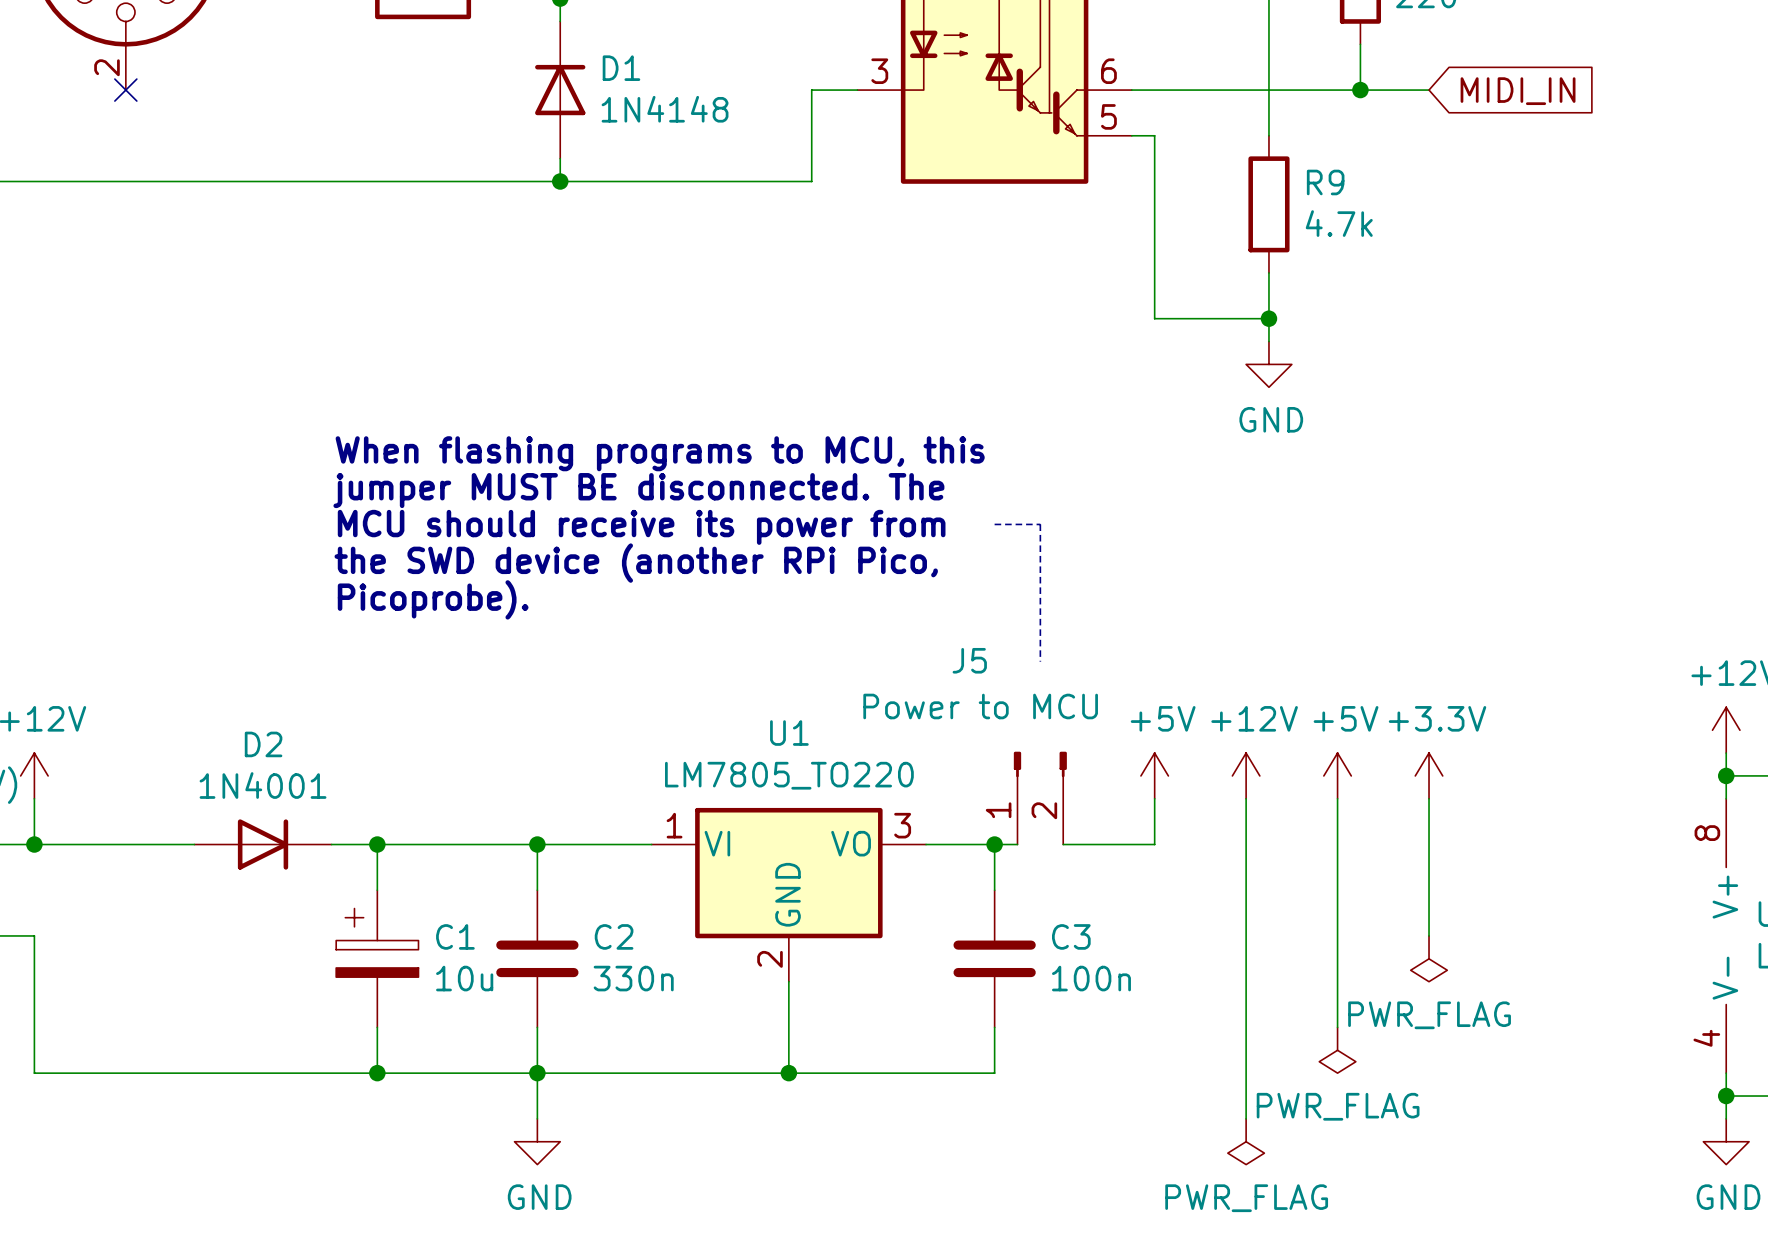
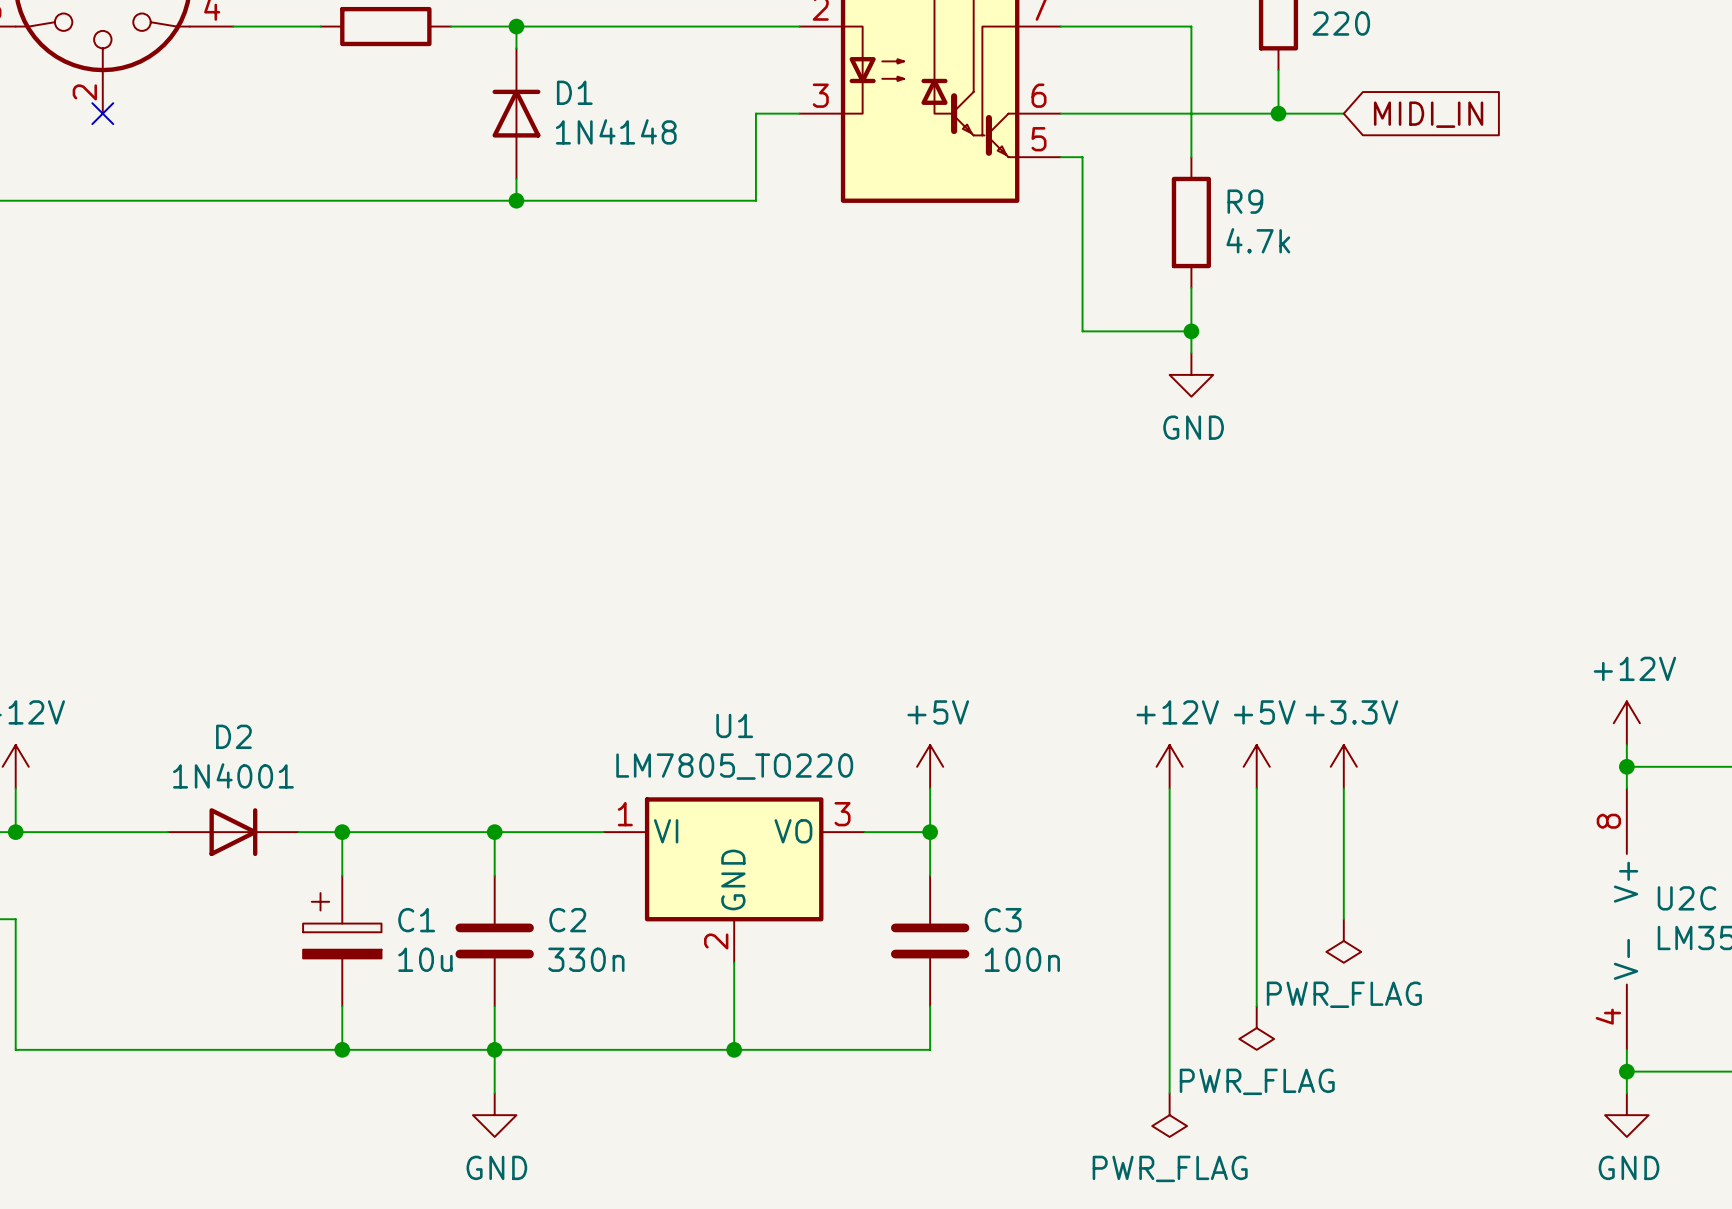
text: When flashing programs to MCU, this (660, 453) -> none
text: jumper MUST BE disconnected. The (638, 490) -> none
line: (994, 524) (1040, 524) (1040, 661) -> none
text: MCU should receive its power from (641, 527) -> none
text: the SWD device (another RPi Pico, (636, 563) -> none
text: Picoprobe). (433, 599) -> none
power symbol position: +5V (1154, 775) -> +5V (930, 766)
J5: Power to MCU (1040, 798) -> none
wire: (1154, 798) (1154, 844) (1063, 844) -> none
wire: (994, 844) (1017, 844) -> (930, 832) (930, 788)

